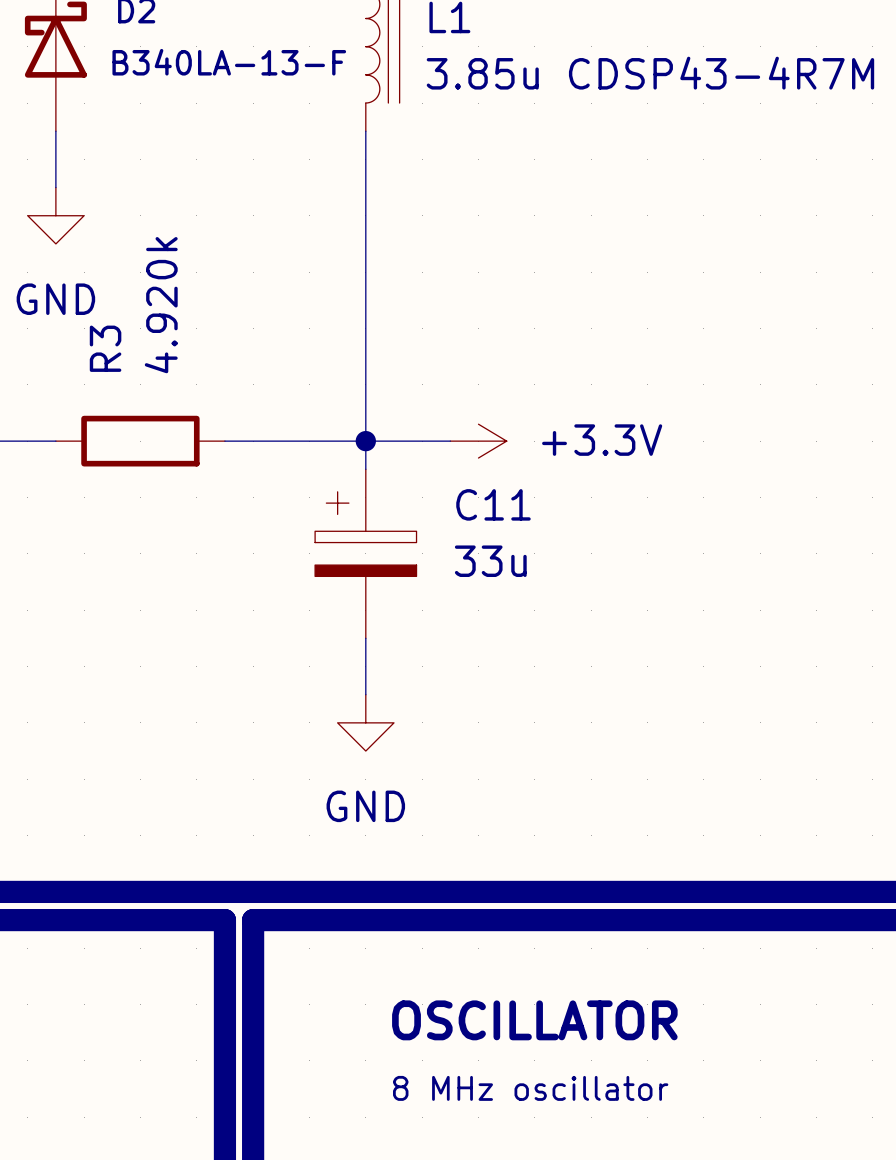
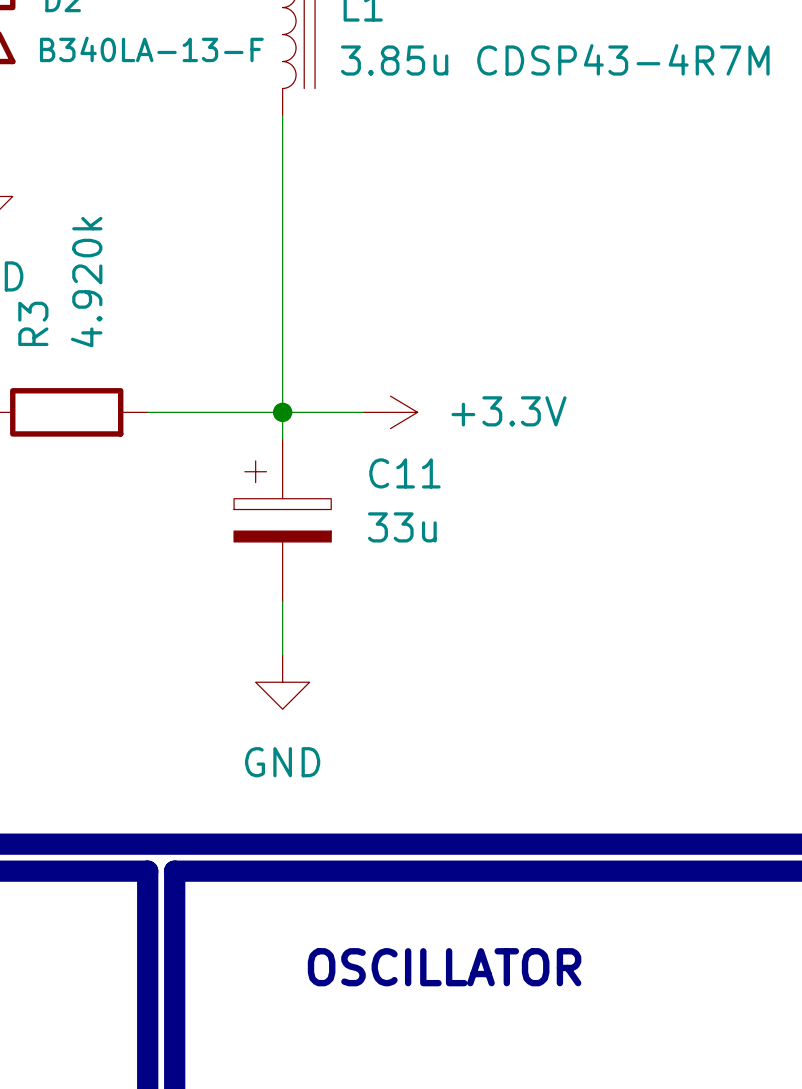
text: 8 MHz oscillator (530, 1088) -> none

